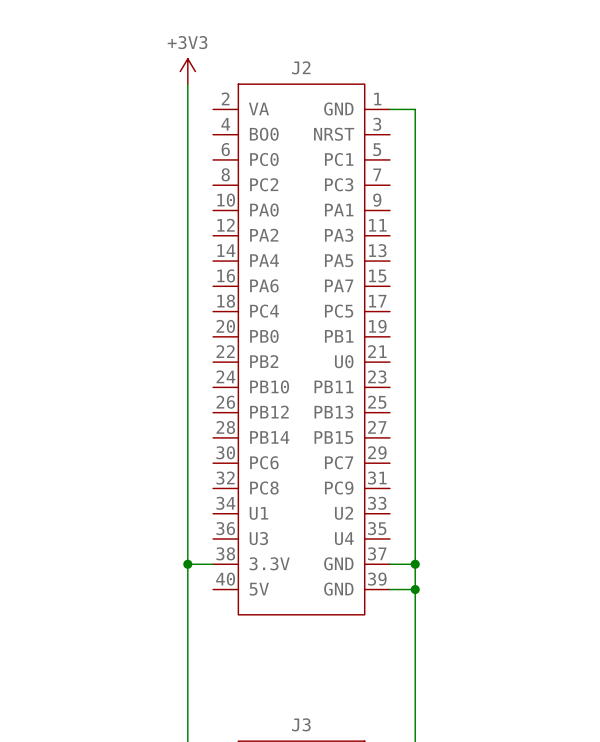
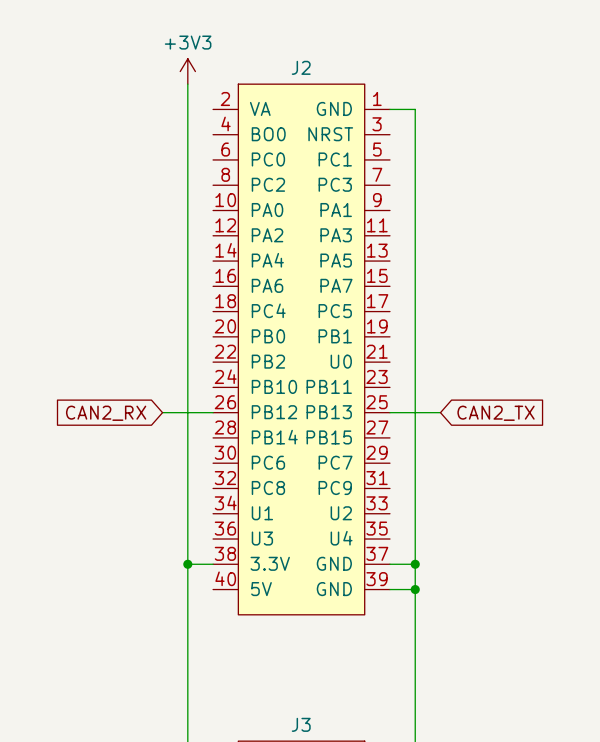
wire: none -> (162, 412) (213, 412)
wire: none -> (389, 412) (440, 412)
global label: none -> CAN2_RX (106, 413)
global label: none -> CAN2_TX (496, 413)

